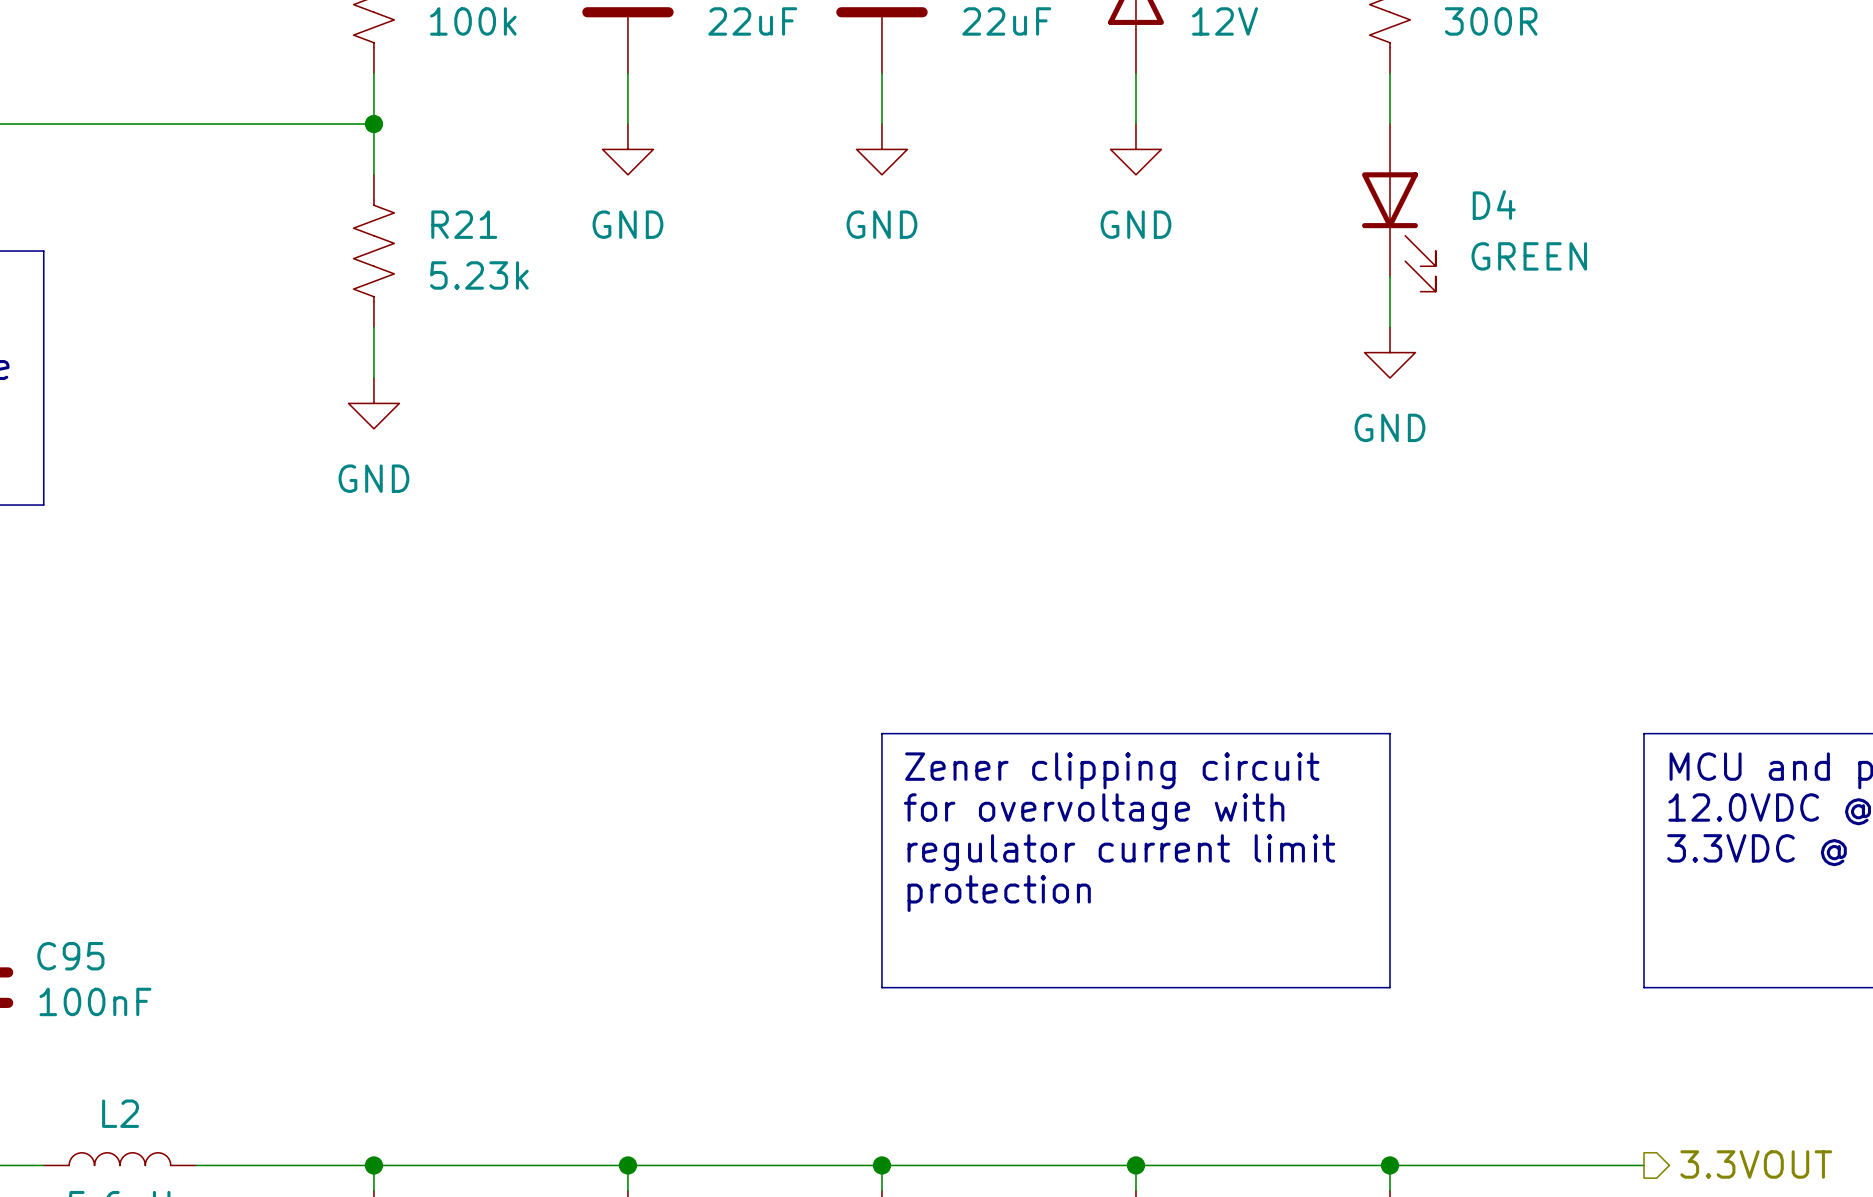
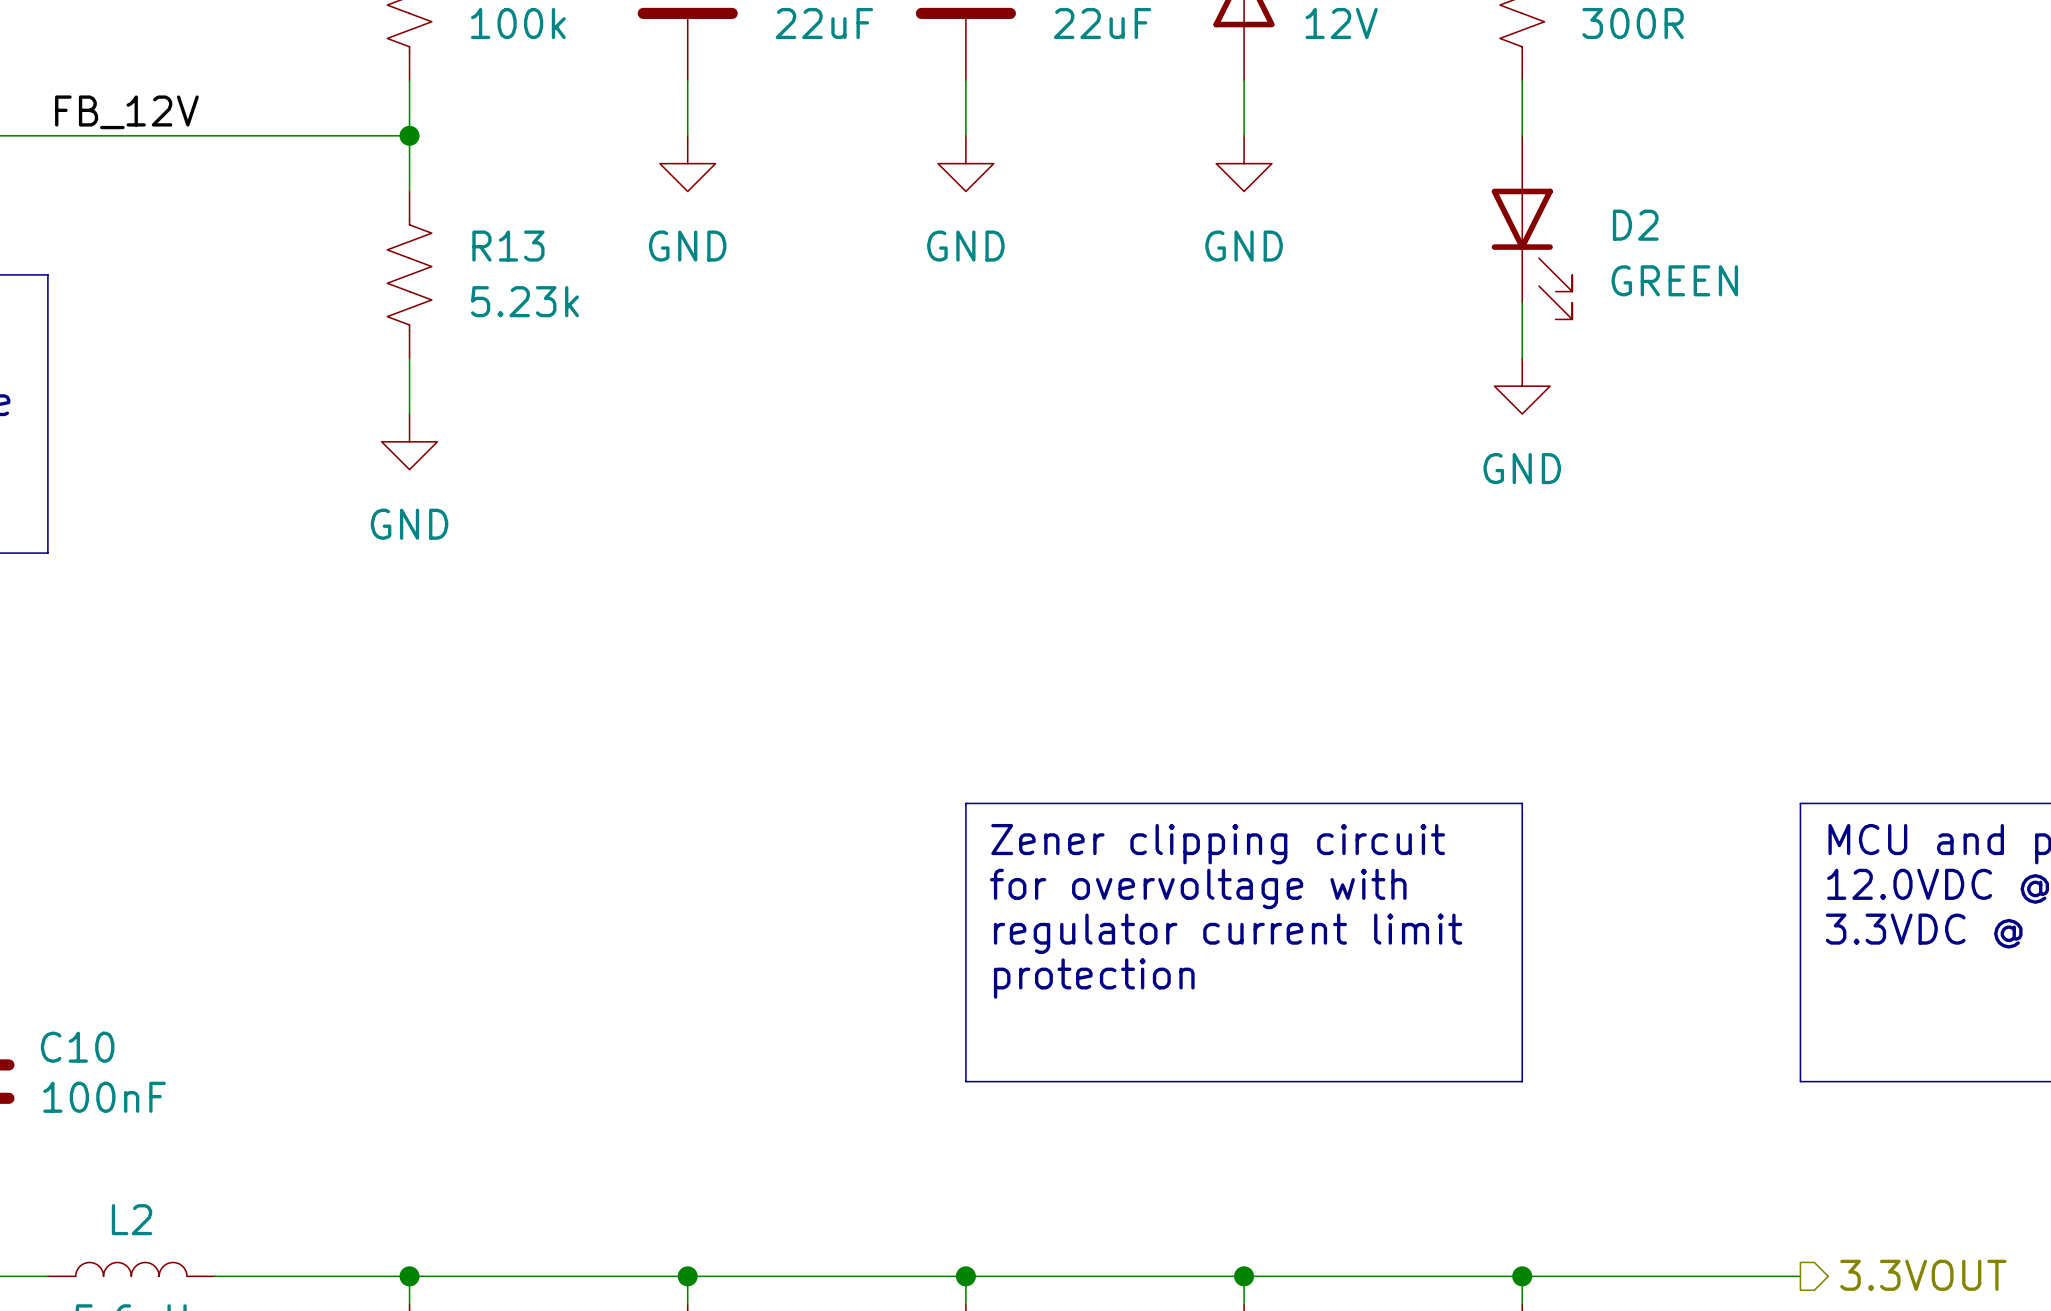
label: none -> FB_12V (126, 112)
D4 name: D4 (1494, 205) -> D2 (1635, 225)
R21 name: R21 (464, 224) -> R13 (508, 246)
C95 name: C95 (70, 956) -> C10 (77, 1047)

